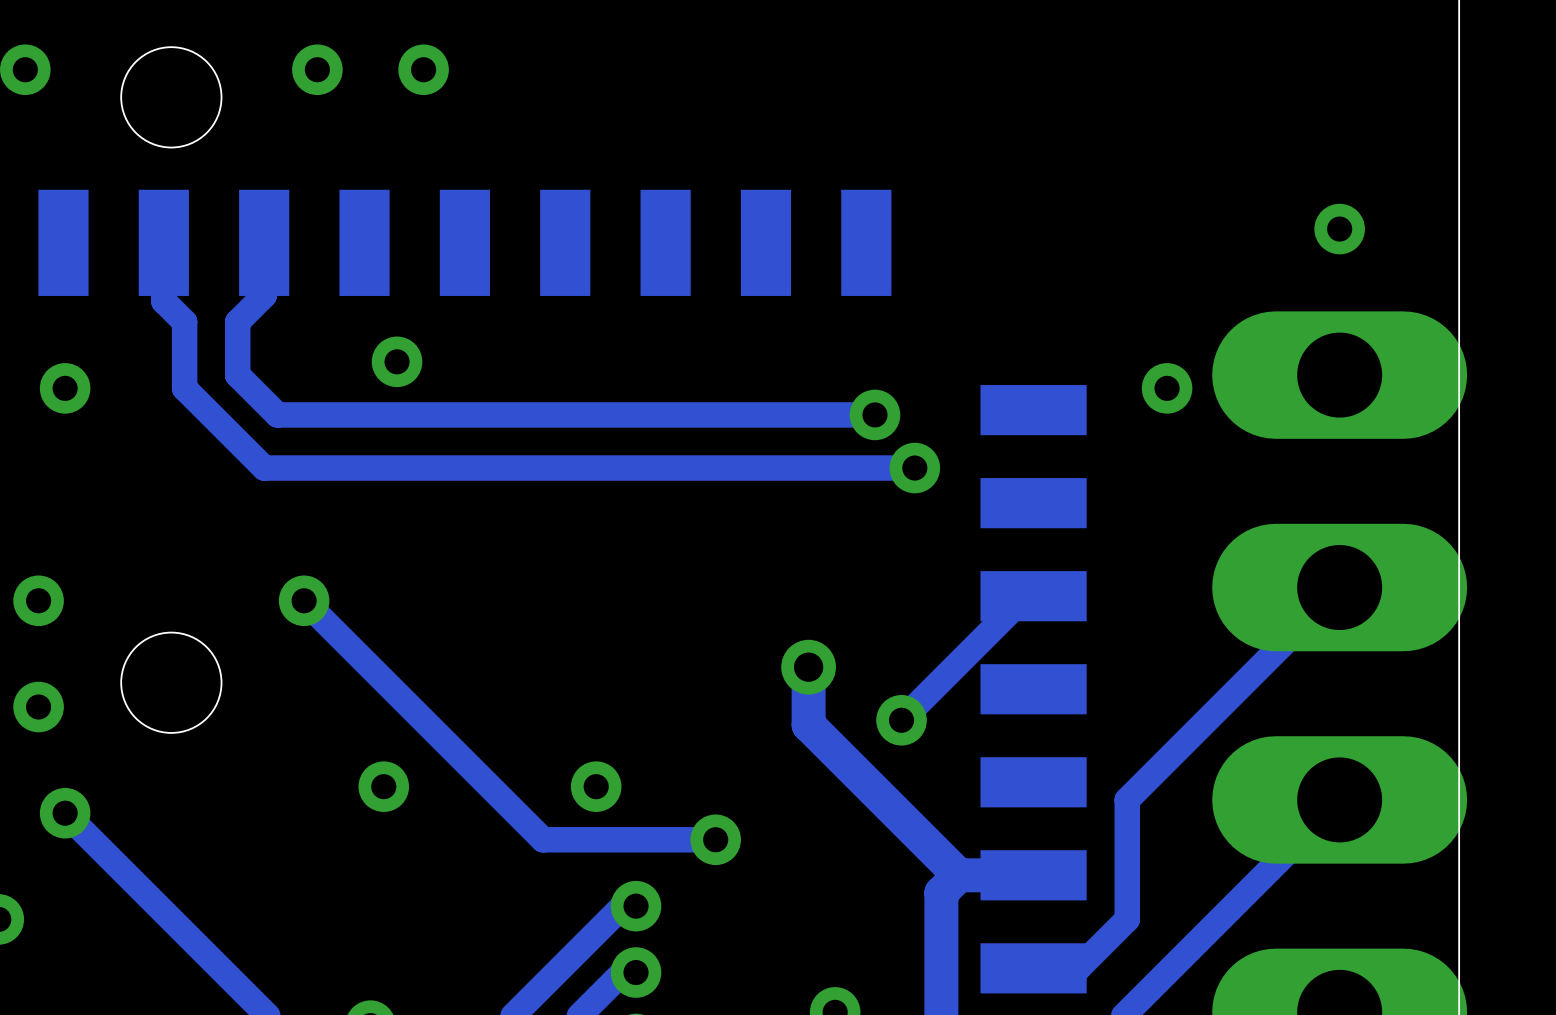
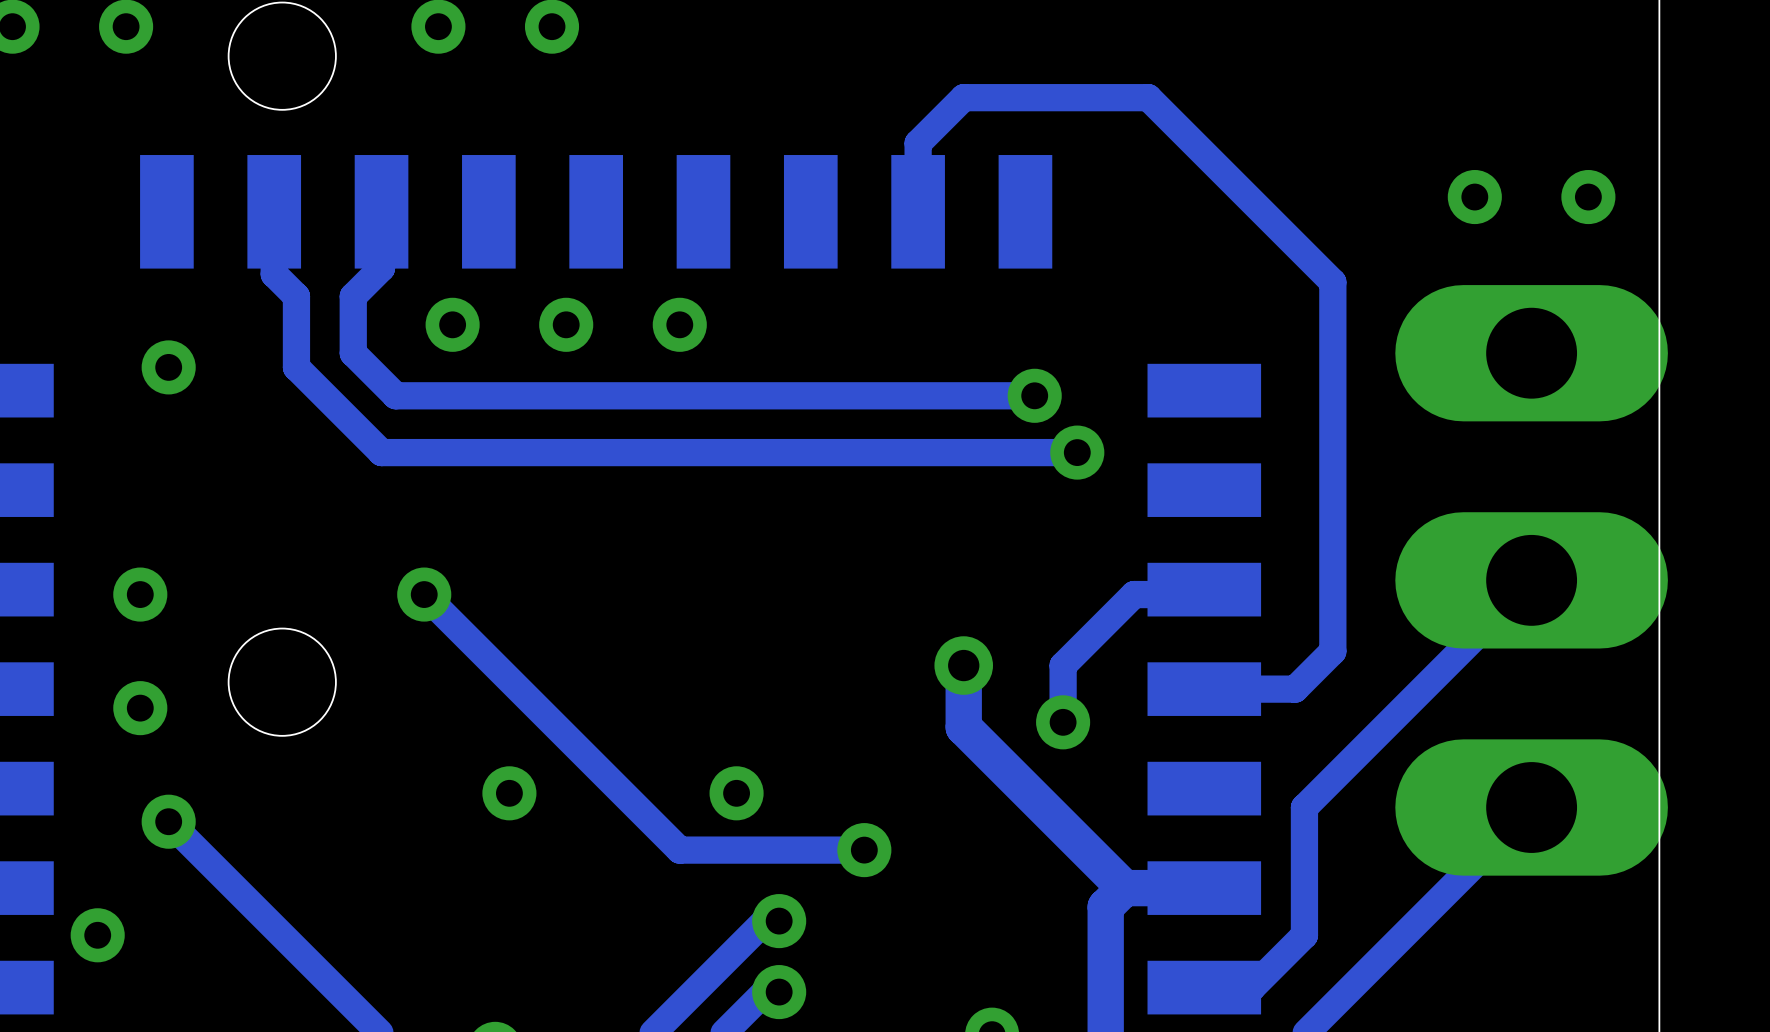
via: none -> (1474, 197)
via: (1339, 229) -> none
via: none -> (1588, 197)
track: none -> (918, 211) (918, 143) (963, 97) (1148, 97) (1332, 282) (1332, 651) (1295, 689) (1204, 689)
via: none -> (452, 324)
via: none -> (679, 324)
via position: (397, 361) -> (566, 324)
via: (1167, 388) -> none
track: (1021, 600) (901, 720) -> (1190, 594) (1134, 594) (1063, 665) (1063, 722)

